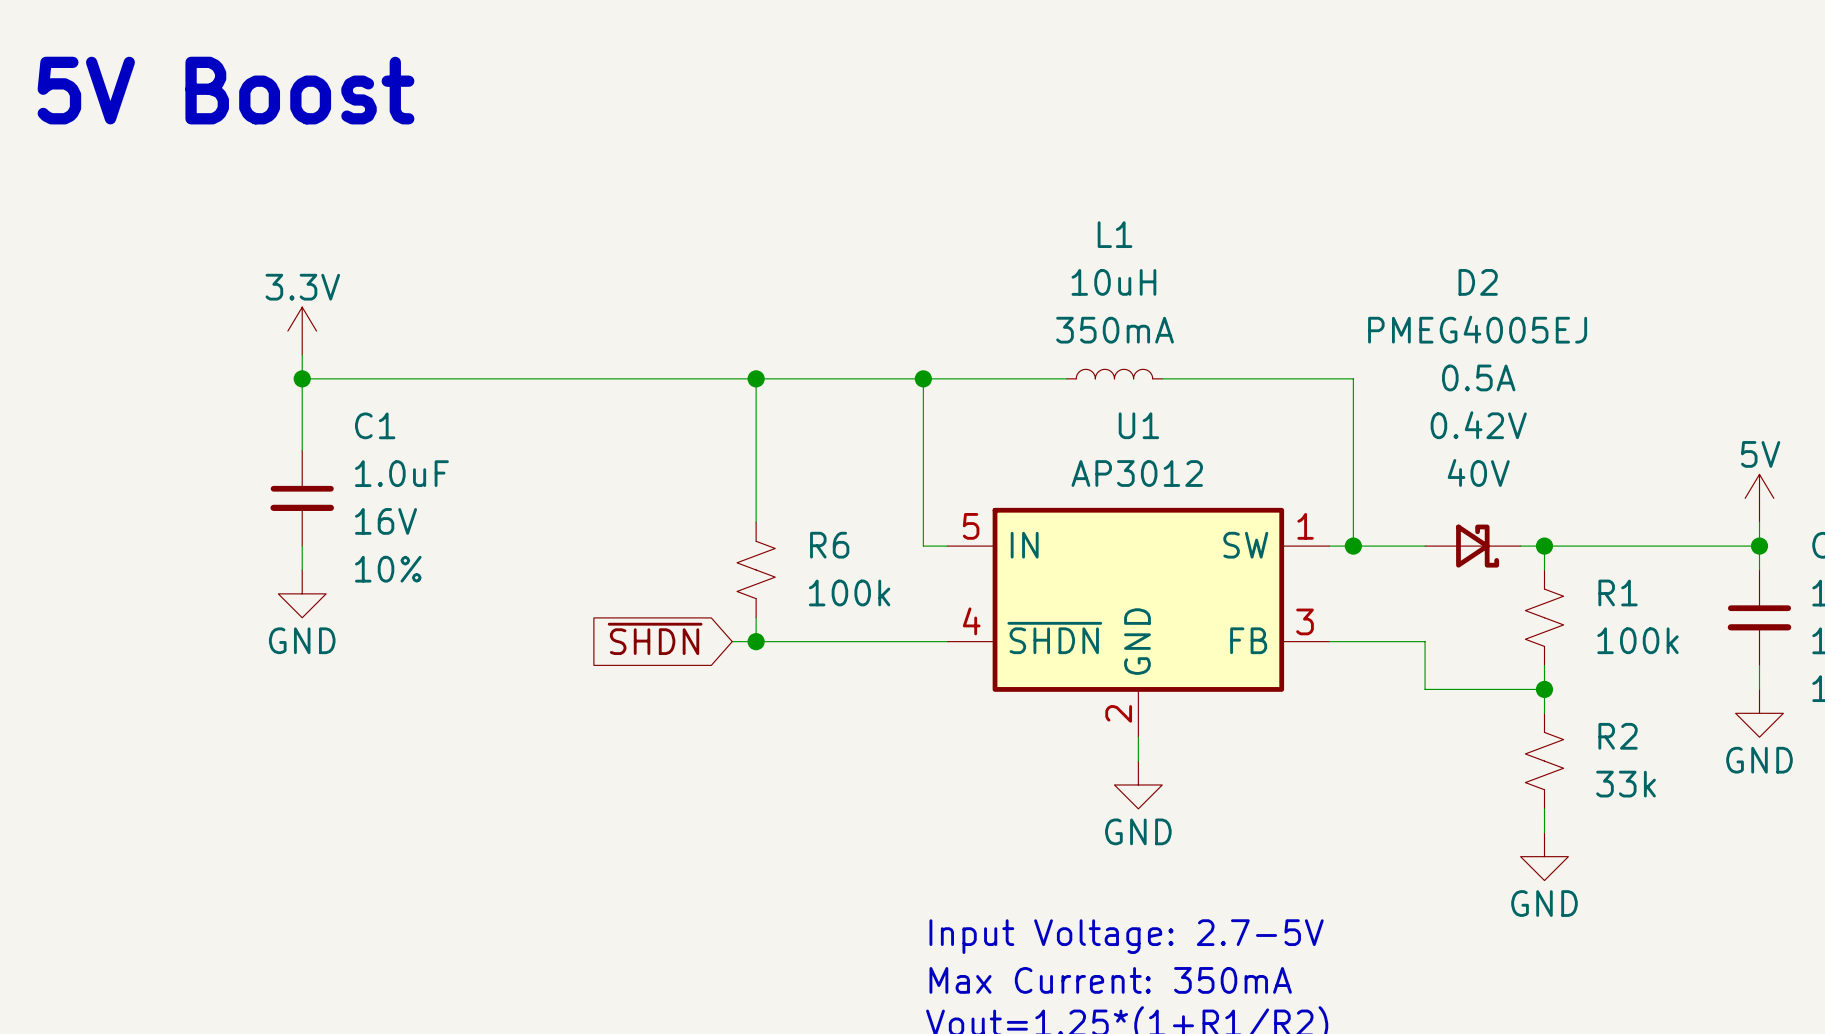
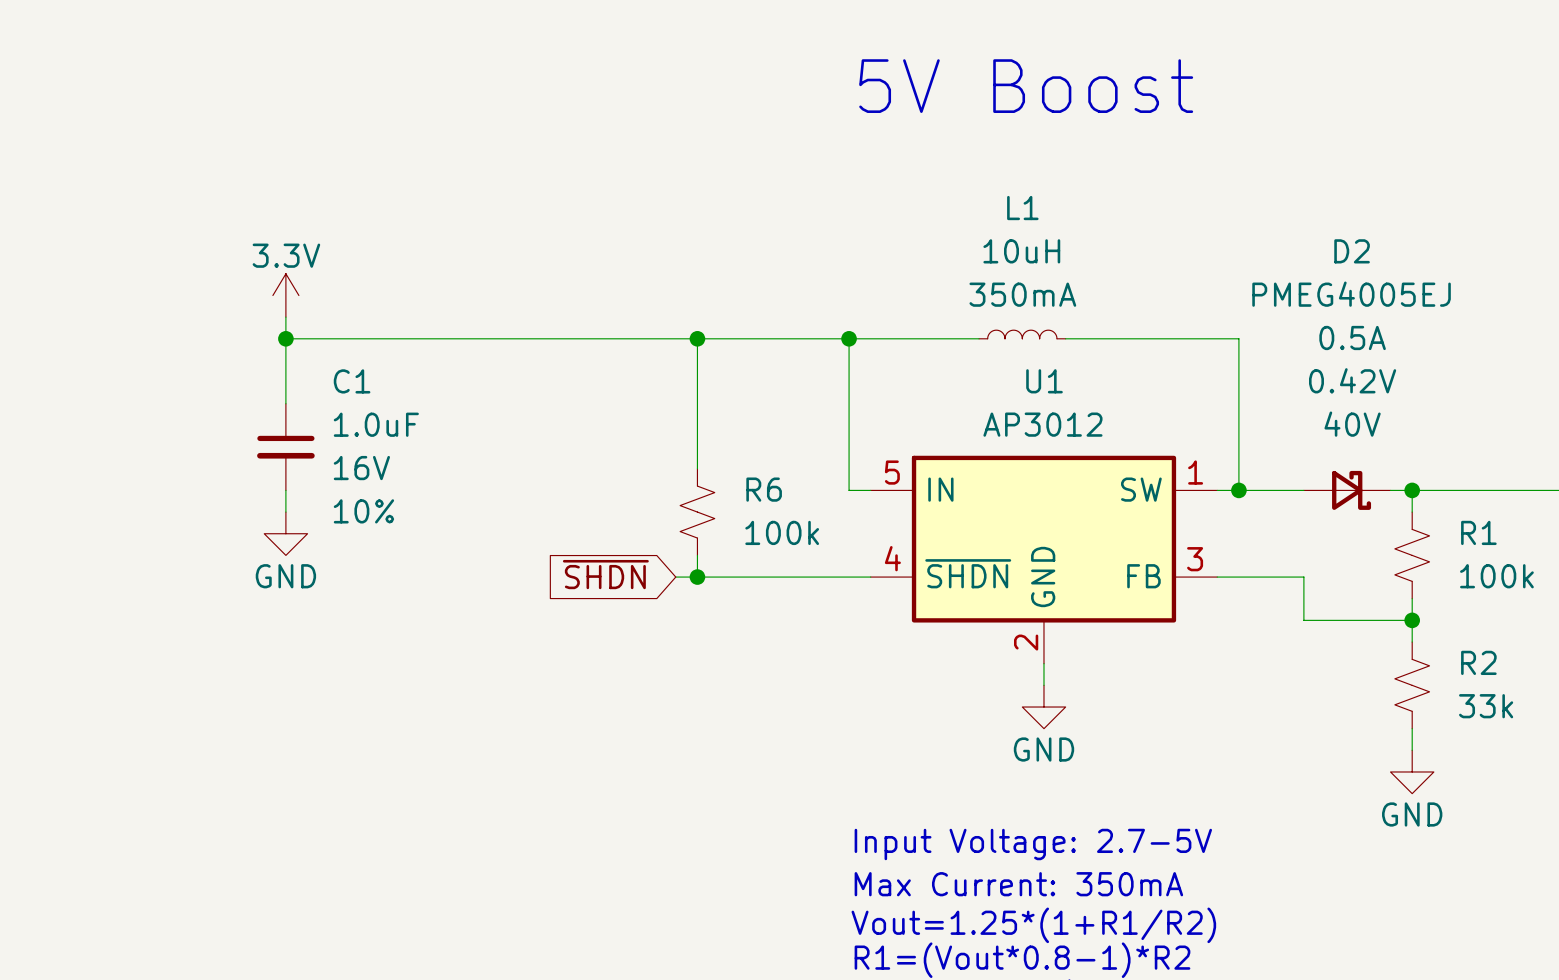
text: 5V Boost (226, 90) -> none
text: none -> 5V Boost (1026, 86)

